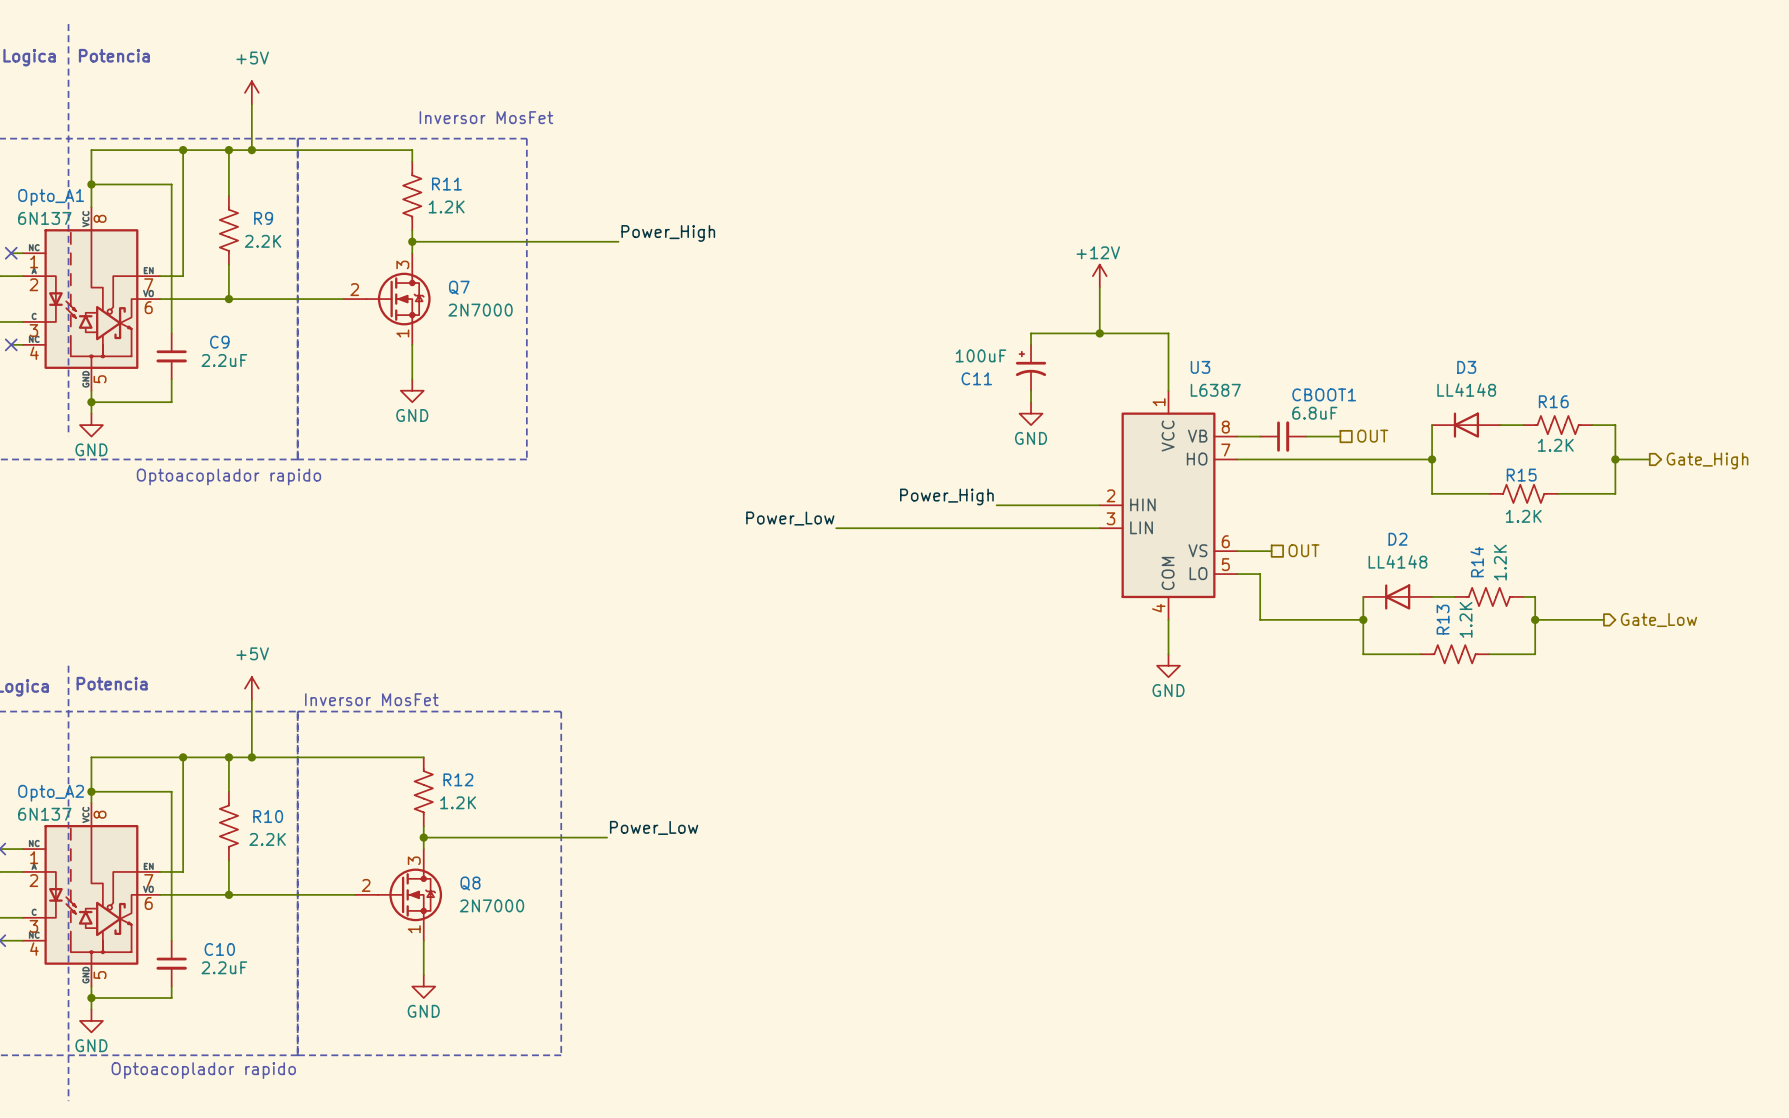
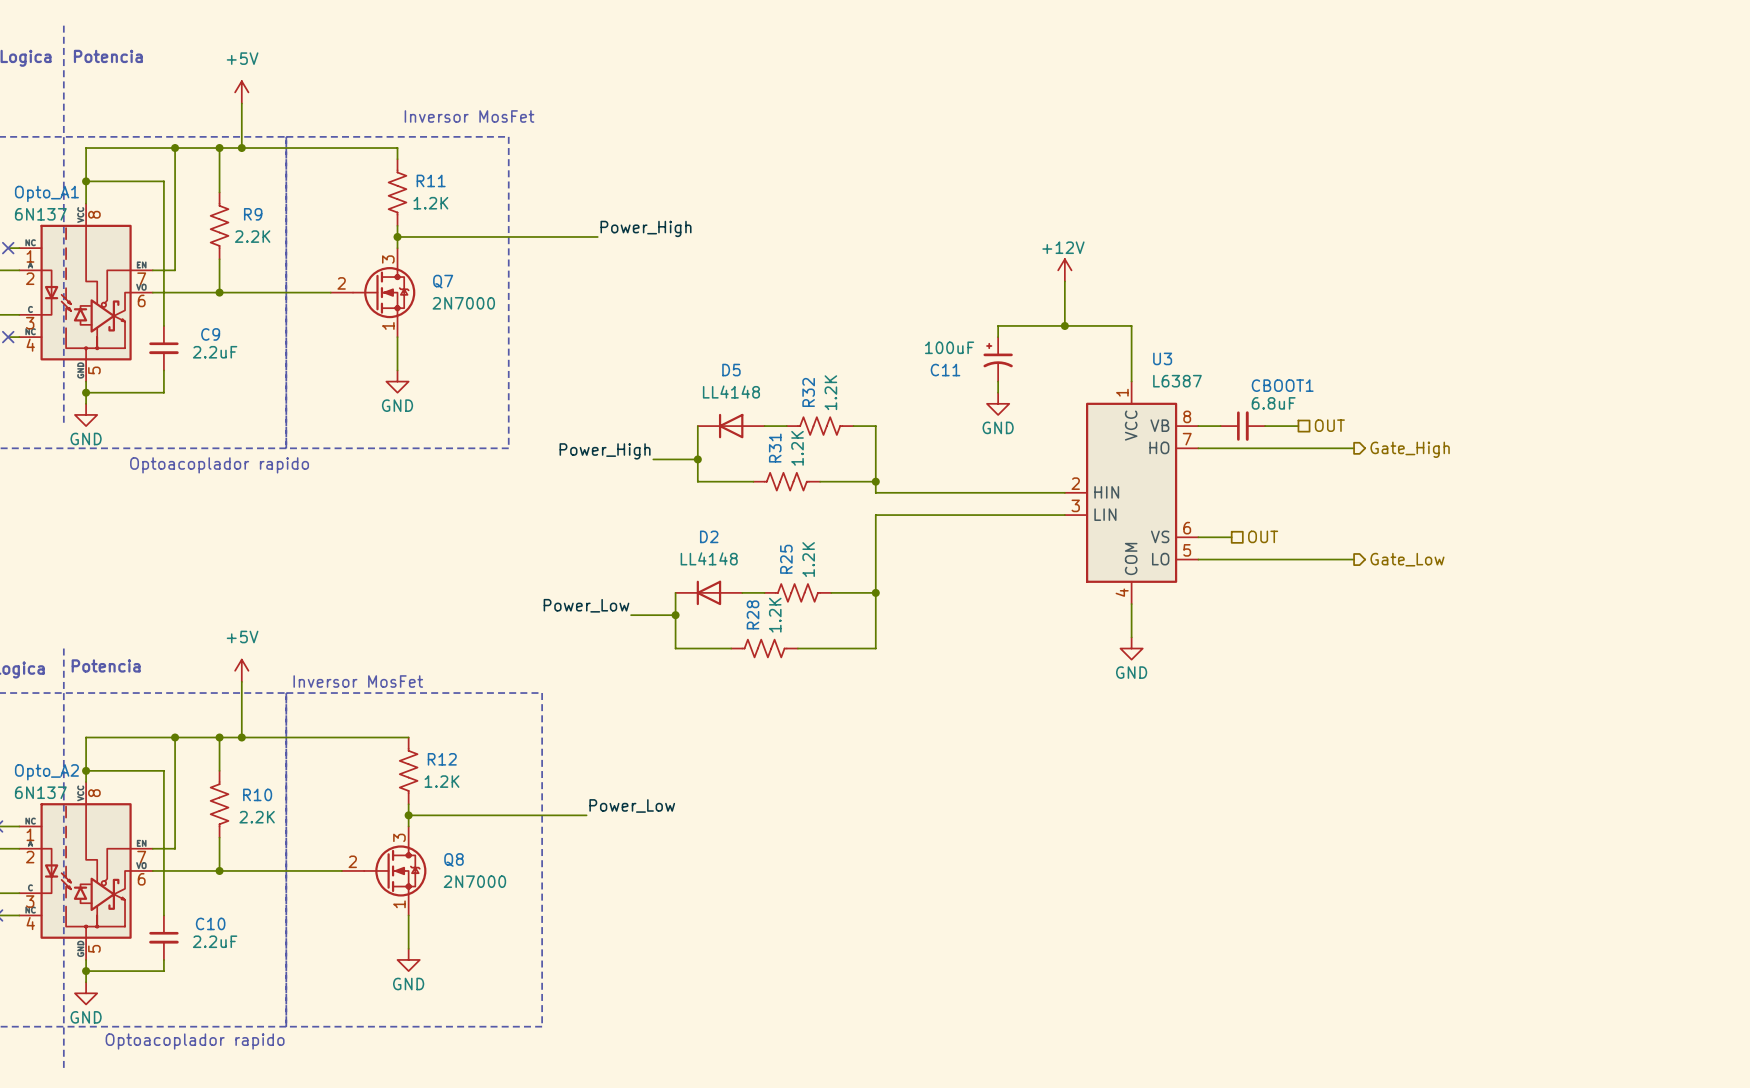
wire: (1432, 425) (1432, 493) (1489, 493) -> none
D3: LL4148 (1466, 425) -> none
wire: (1500, 425) (1523, 425) -> none
R16: 1.2K (1558, 425) -> none
wire: (1592, 425) (1615, 425) (1615, 493) (1558, 493) -> none
wire: none -> (697, 426) (697, 481) (753, 481)
D5: none -> LL4148 (731, 426)
wire: none -> (764, 426) (786, 426)
R32: none -> 1.2K (820, 426)
wire: none -> (853, 426) (875, 426) (875, 492) (964, 492)
wire: (1397, 459) (1432, 459) -> none
junction: (1432, 459) -> none
wire: (1615, 459) (1649, 459) -> none
junction: (1615, 459) -> none
hierarchical label: none -> Gate_High (1410, 449)
hierarchical label: Gate_High (1707, 460) -> none
label: none -> Power_High (605, 451)
wire: none -> (653, 459) (697, 459)
junction: none -> (697, 459)
R31: none -> 1.2K (786, 481)
wire: none -> (820, 481) (875, 481)
junction: none -> (875, 481)
R15: 1.2K (1523, 493) -> none
label: Power_High (946, 496) -> none
label position: Power_Low (790, 518) -> Power_Low (586, 605)
wire: (836, 528) (904, 528) -> (797, 648) (875, 648) (875, 515)
wire: (1260, 574) (1260, 619) (1363, 619) -> (1220, 559) (1354, 559)
wire: (1363, 596) (1363, 654) (1420, 654) -> none
D2 position: (1397, 596) -> (708, 592)
wire: (1432, 596) (1454, 596) -> none
R14: 1.2K (1489, 596) -> none
wire: (1523, 596) (1535, 596) (1535, 654) (1489, 654) -> none
wire: none -> (675, 592) (675, 648) (731, 648)
wire: none -> (742, 592) (764, 592)
R25: none -> 1.2K (797, 592)
wire: none -> (831, 592) (875, 592)
junction: none -> (875, 592)
junction: (1363, 619) -> none
wire: (1535, 619) (1603, 619) -> none
junction: (1535, 619) -> none
hierarchical label position: Gate_Low (1658, 620) -> Gate_Low (1407, 559)
wire: none -> (631, 615) (675, 615)
junction: none -> (675, 615)
R13: 1.2K (1454, 654) -> none
R28: none -> 1.2K (764, 648)

